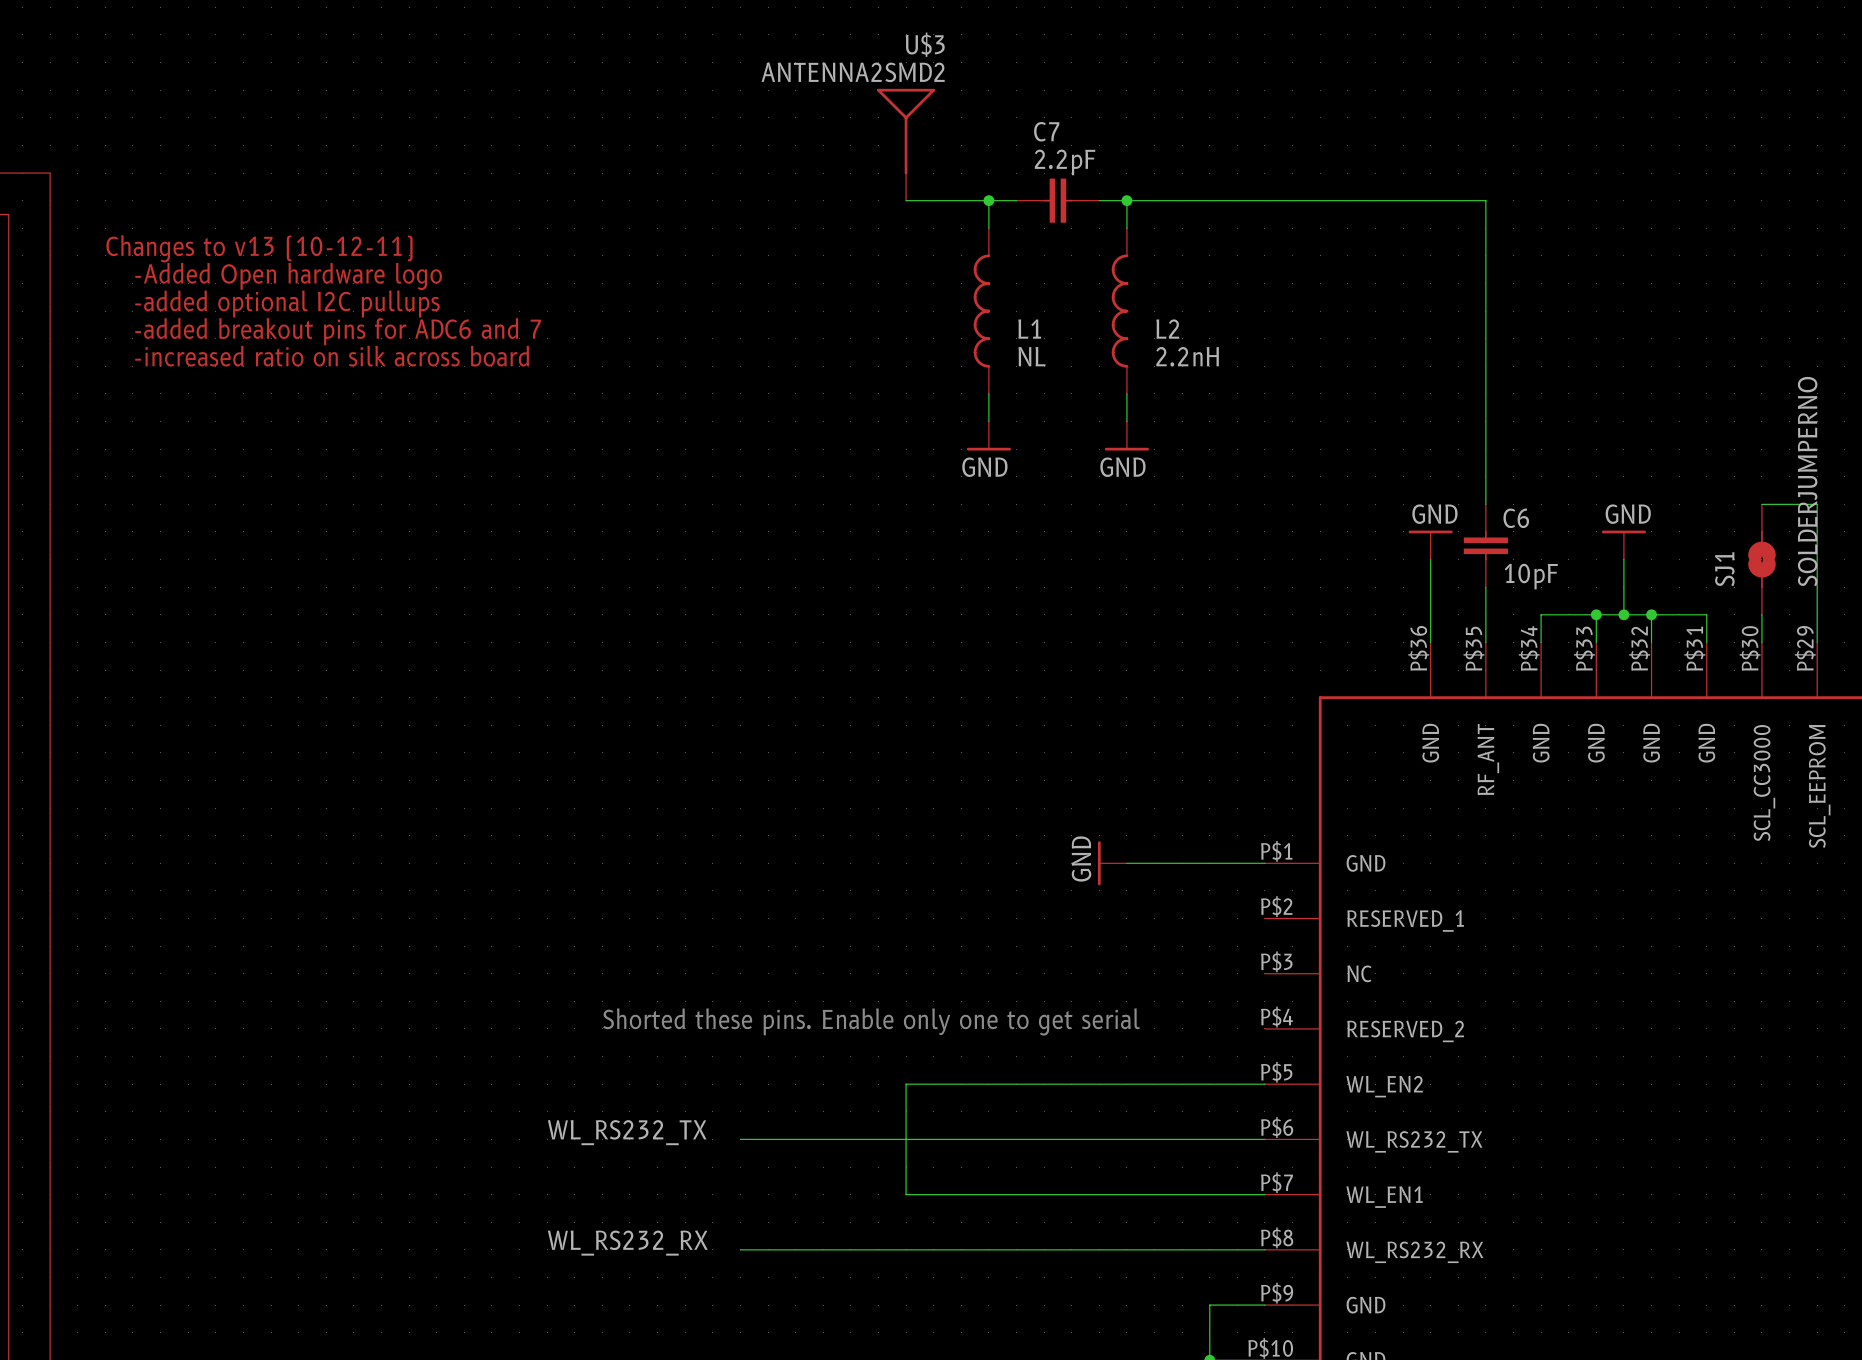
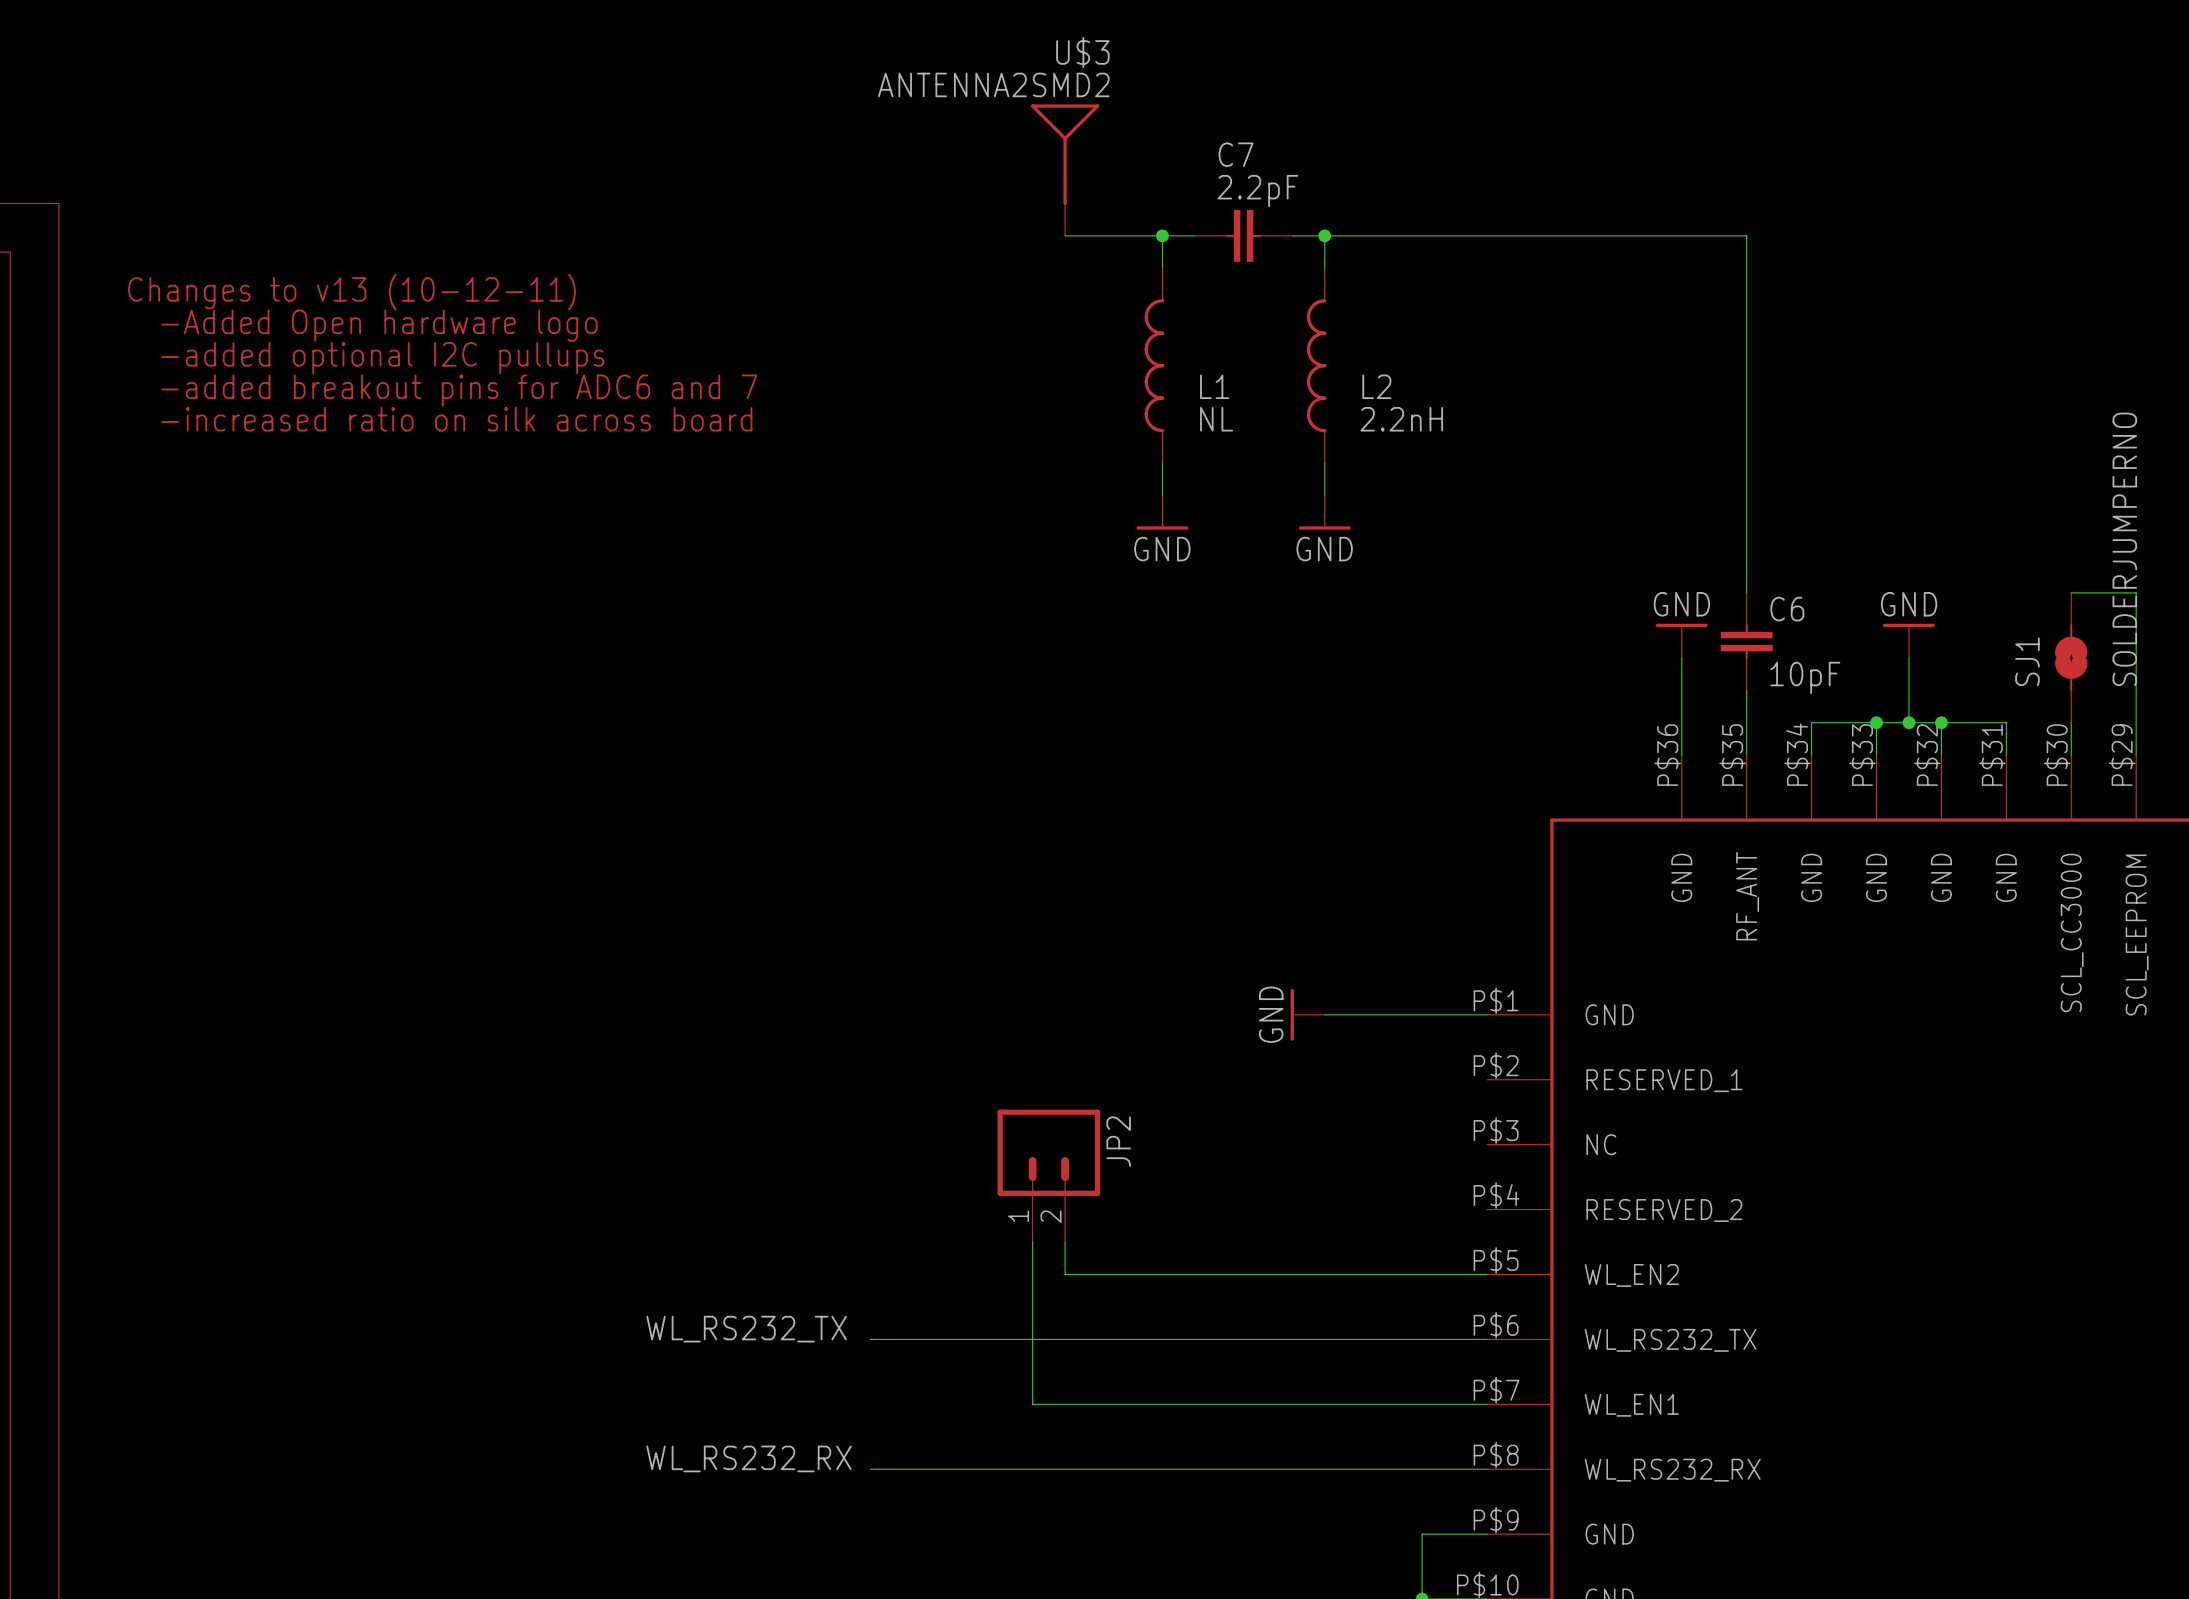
JP2: none -> (1048, 1175)
text: Shorted these pins. Enable only one to get serial (871, 1021) -> none
wire: none -> (1065, 1242) (1065, 1274)
wire: (906, 1084) (906, 1194) -> (1032, 1242) (1032, 1404) (1065, 1404)

